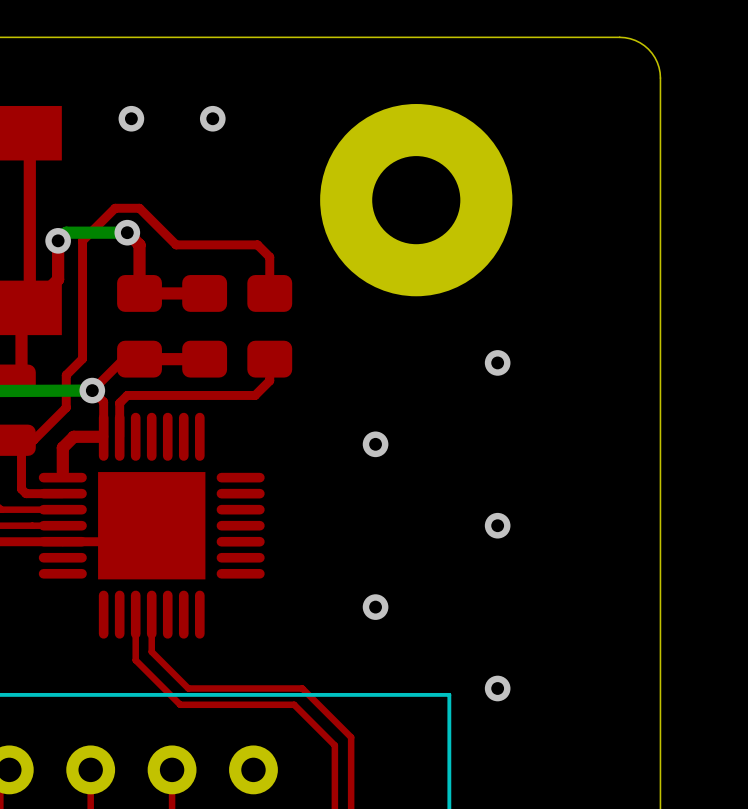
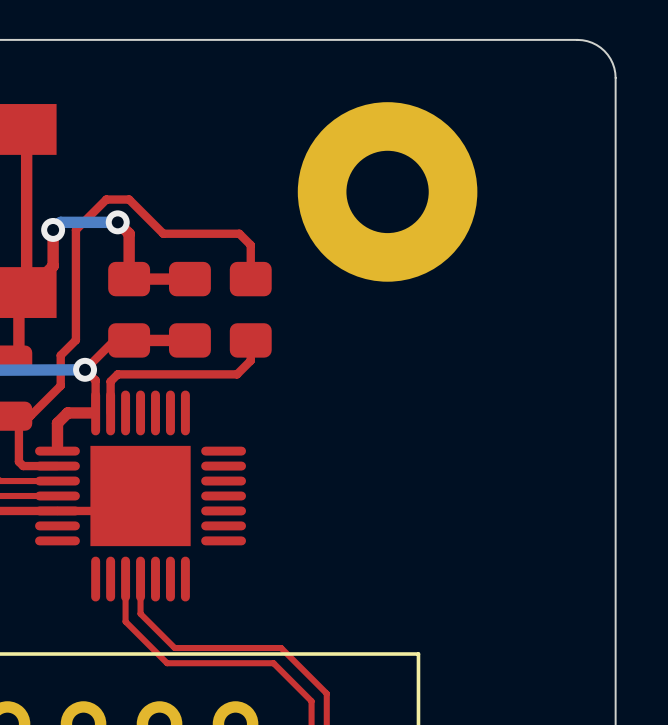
via: (131, 118) -> none
via: (212, 118) -> none
via: (497, 362) -> none
via: (375, 444) -> none
via: (497, 525) -> none
via: (375, 607) -> none
via: (497, 688) -> none

